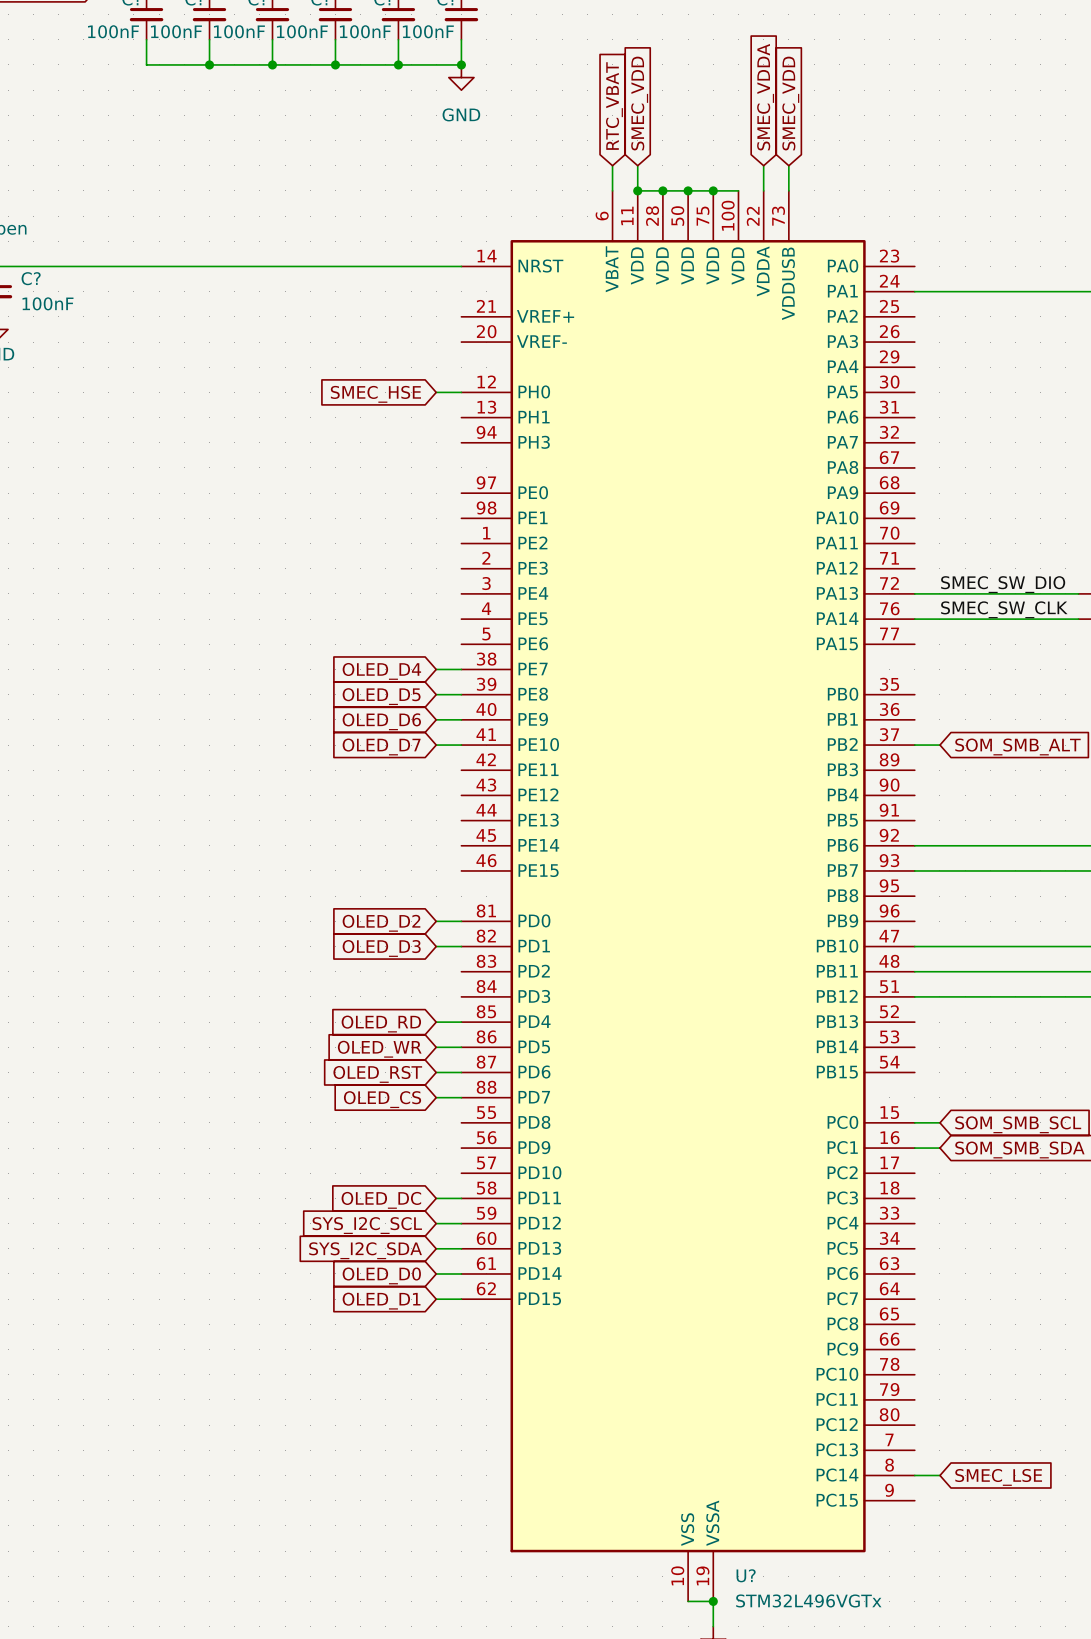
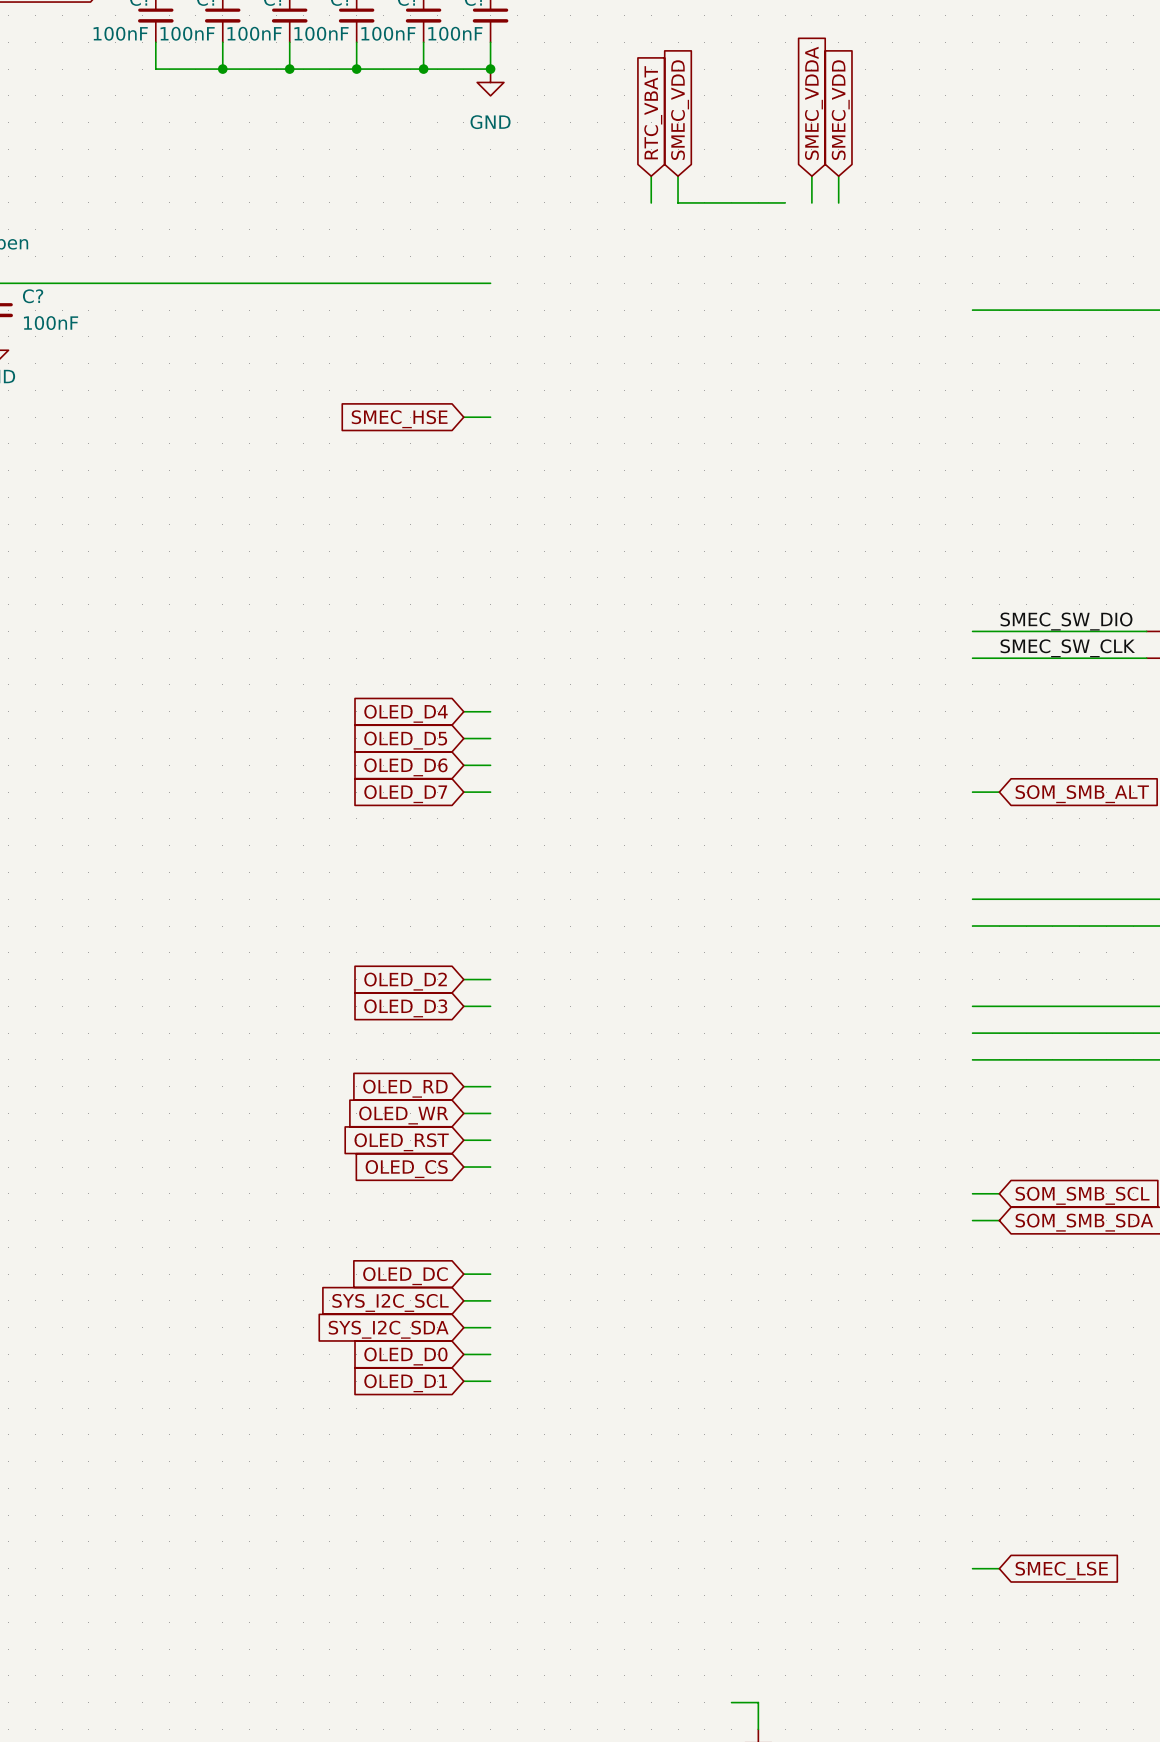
junction: (637, 190) -> none
junction: (662, 190) -> none
junction: (688, 190) -> none
junction: (713, 190) -> none
U?: STM32L496VGTx (688, 896) -> none
junction: (713, 1601) -> none

